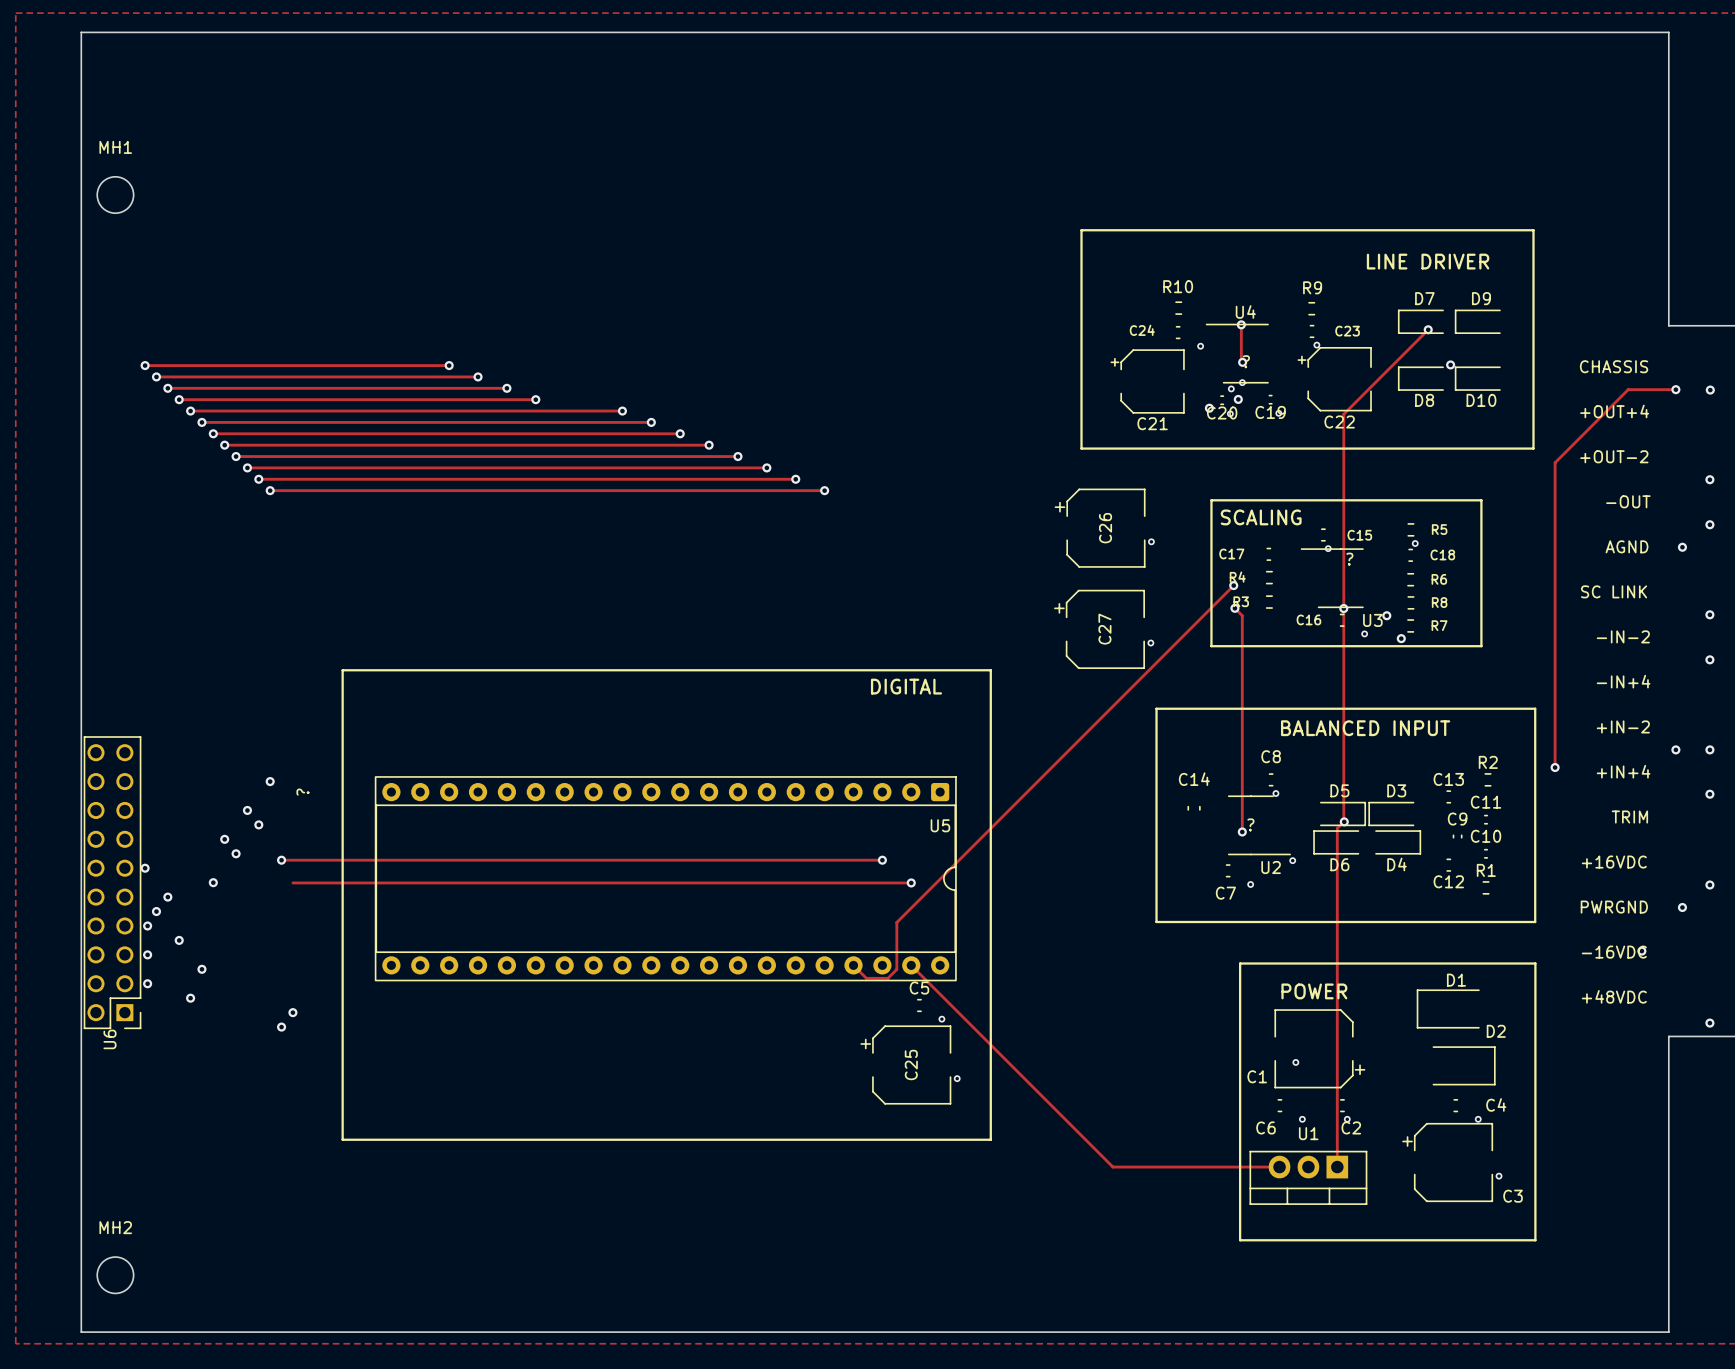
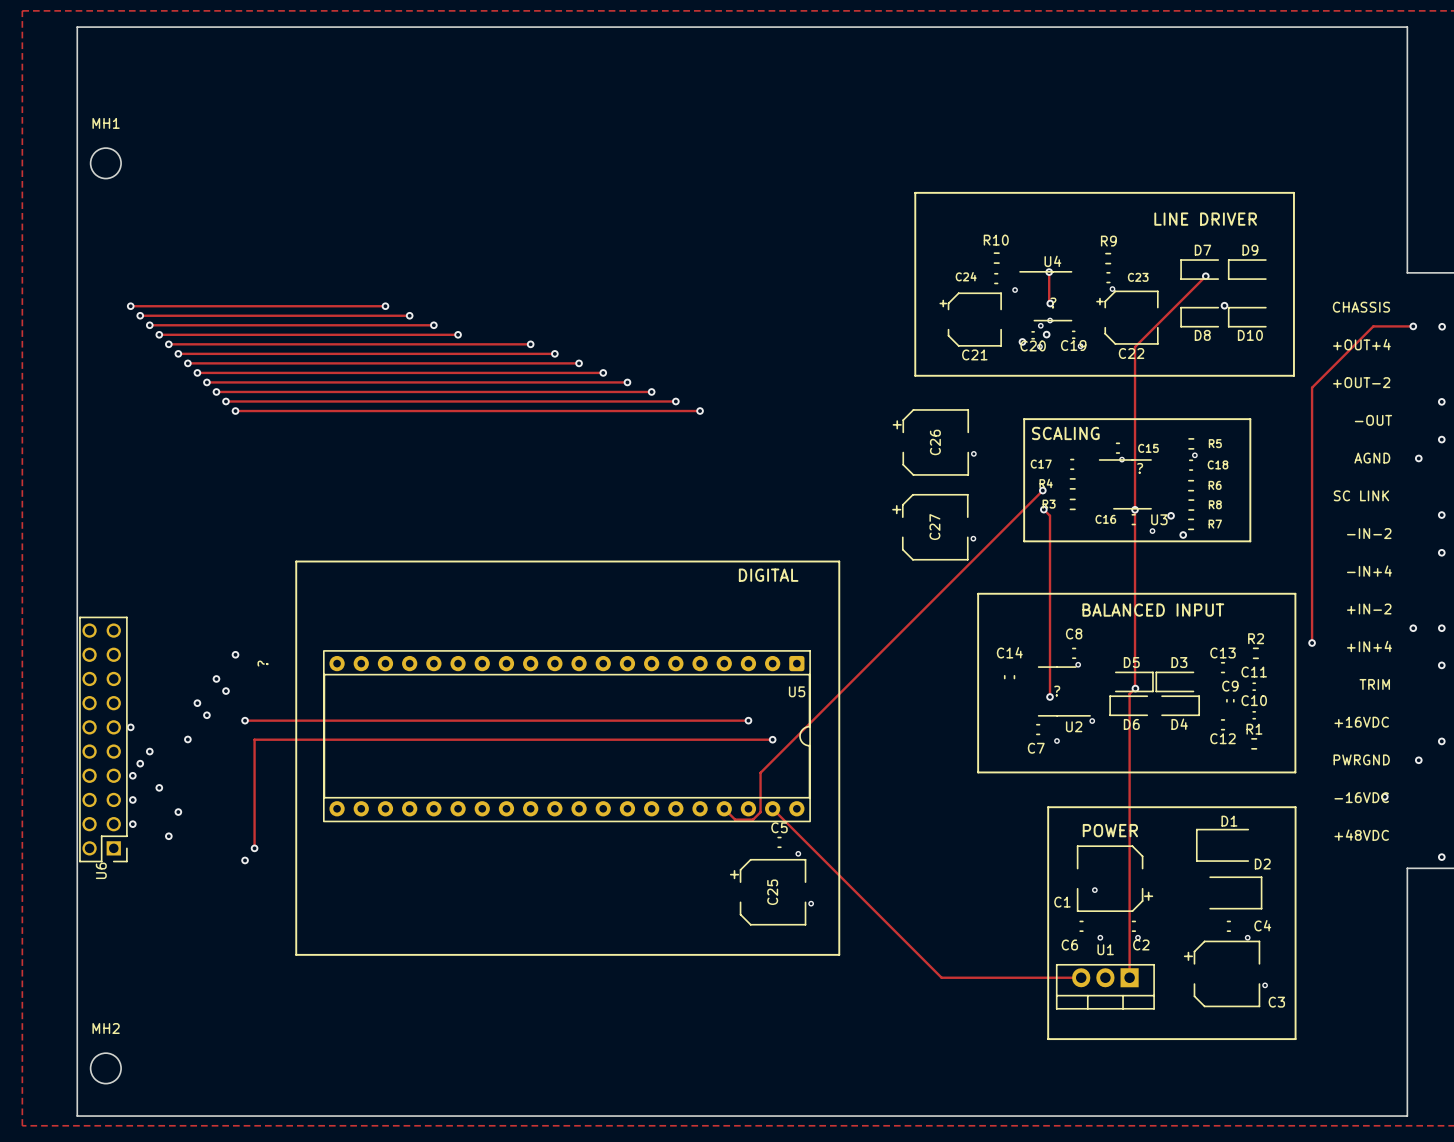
track: none -> (254, 739) (254, 848)

